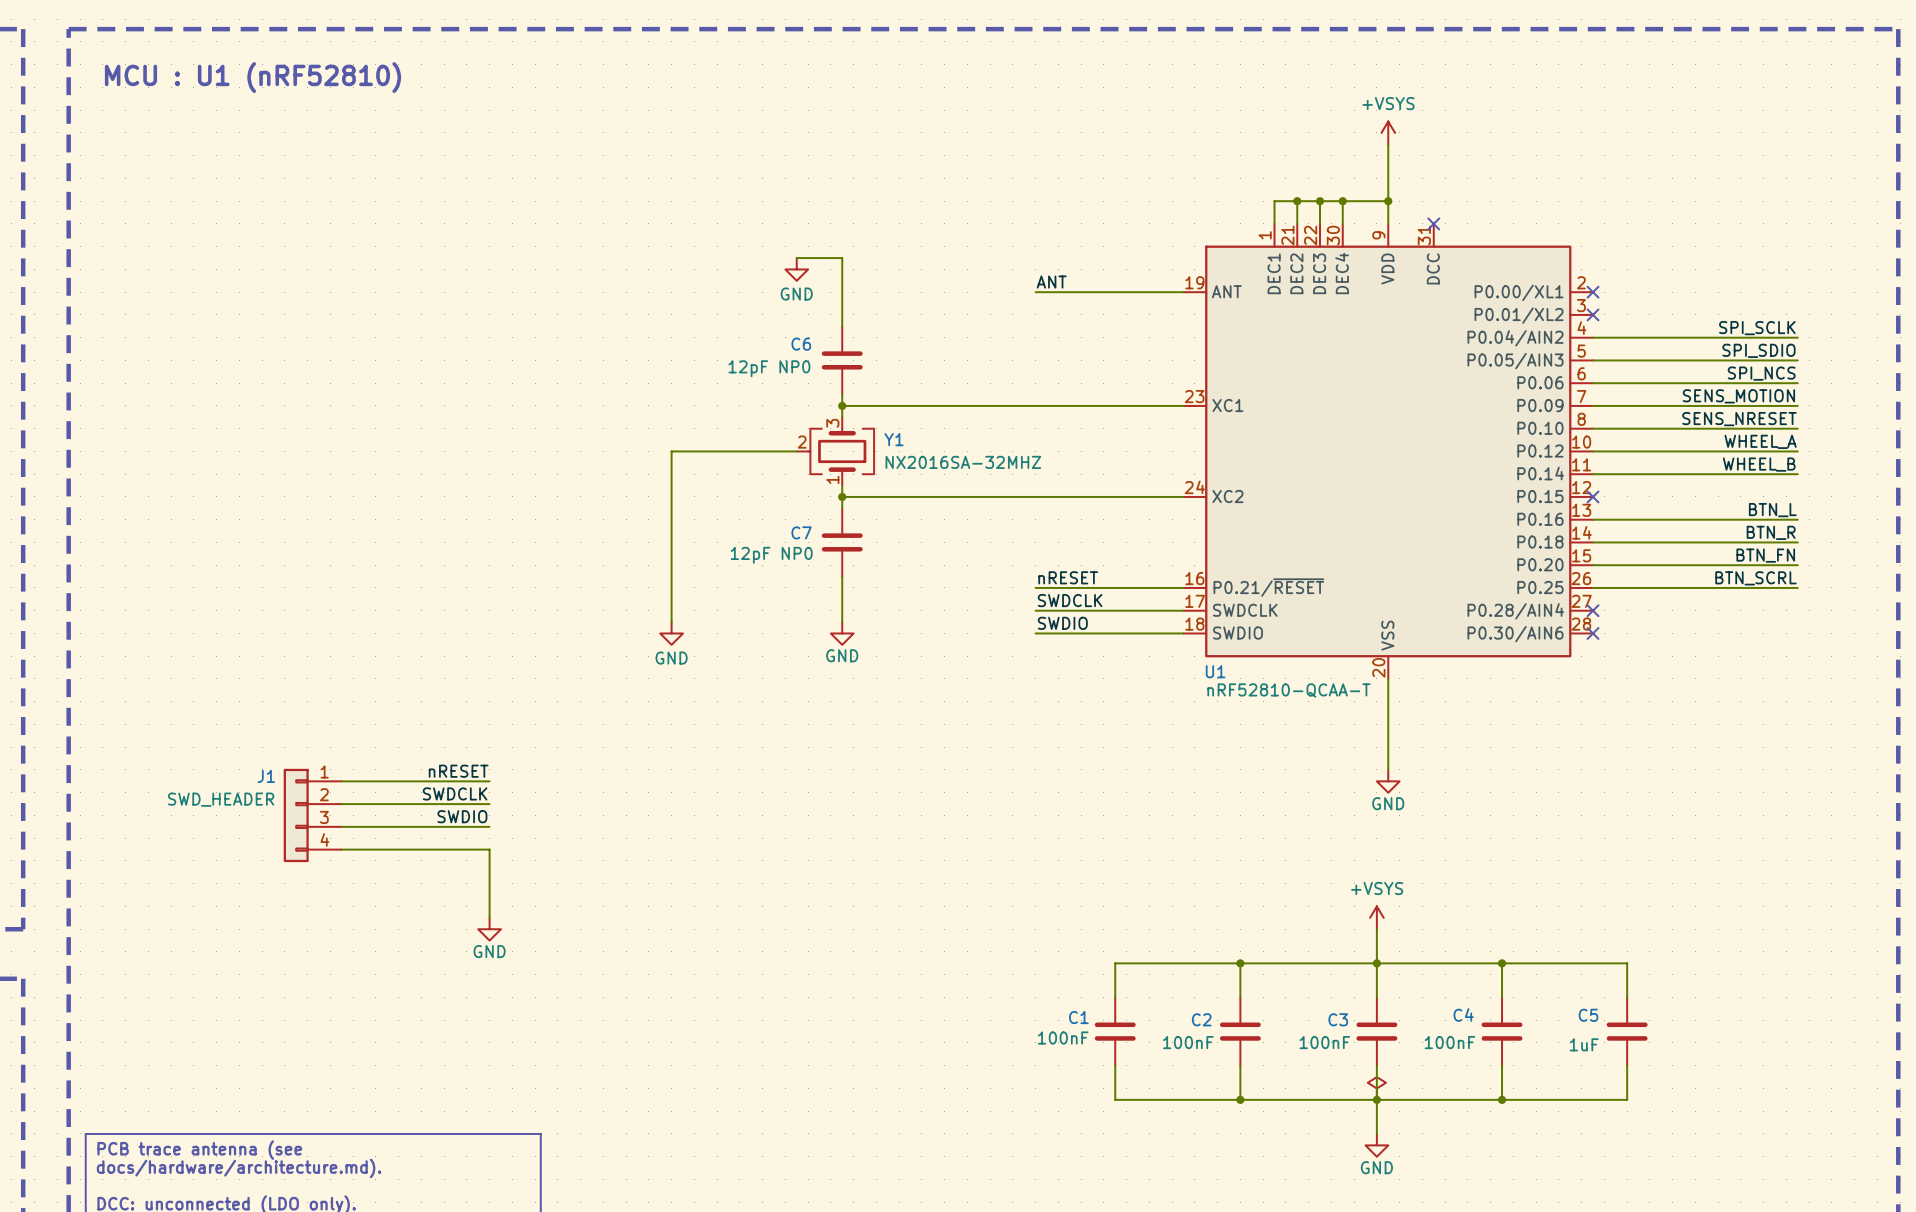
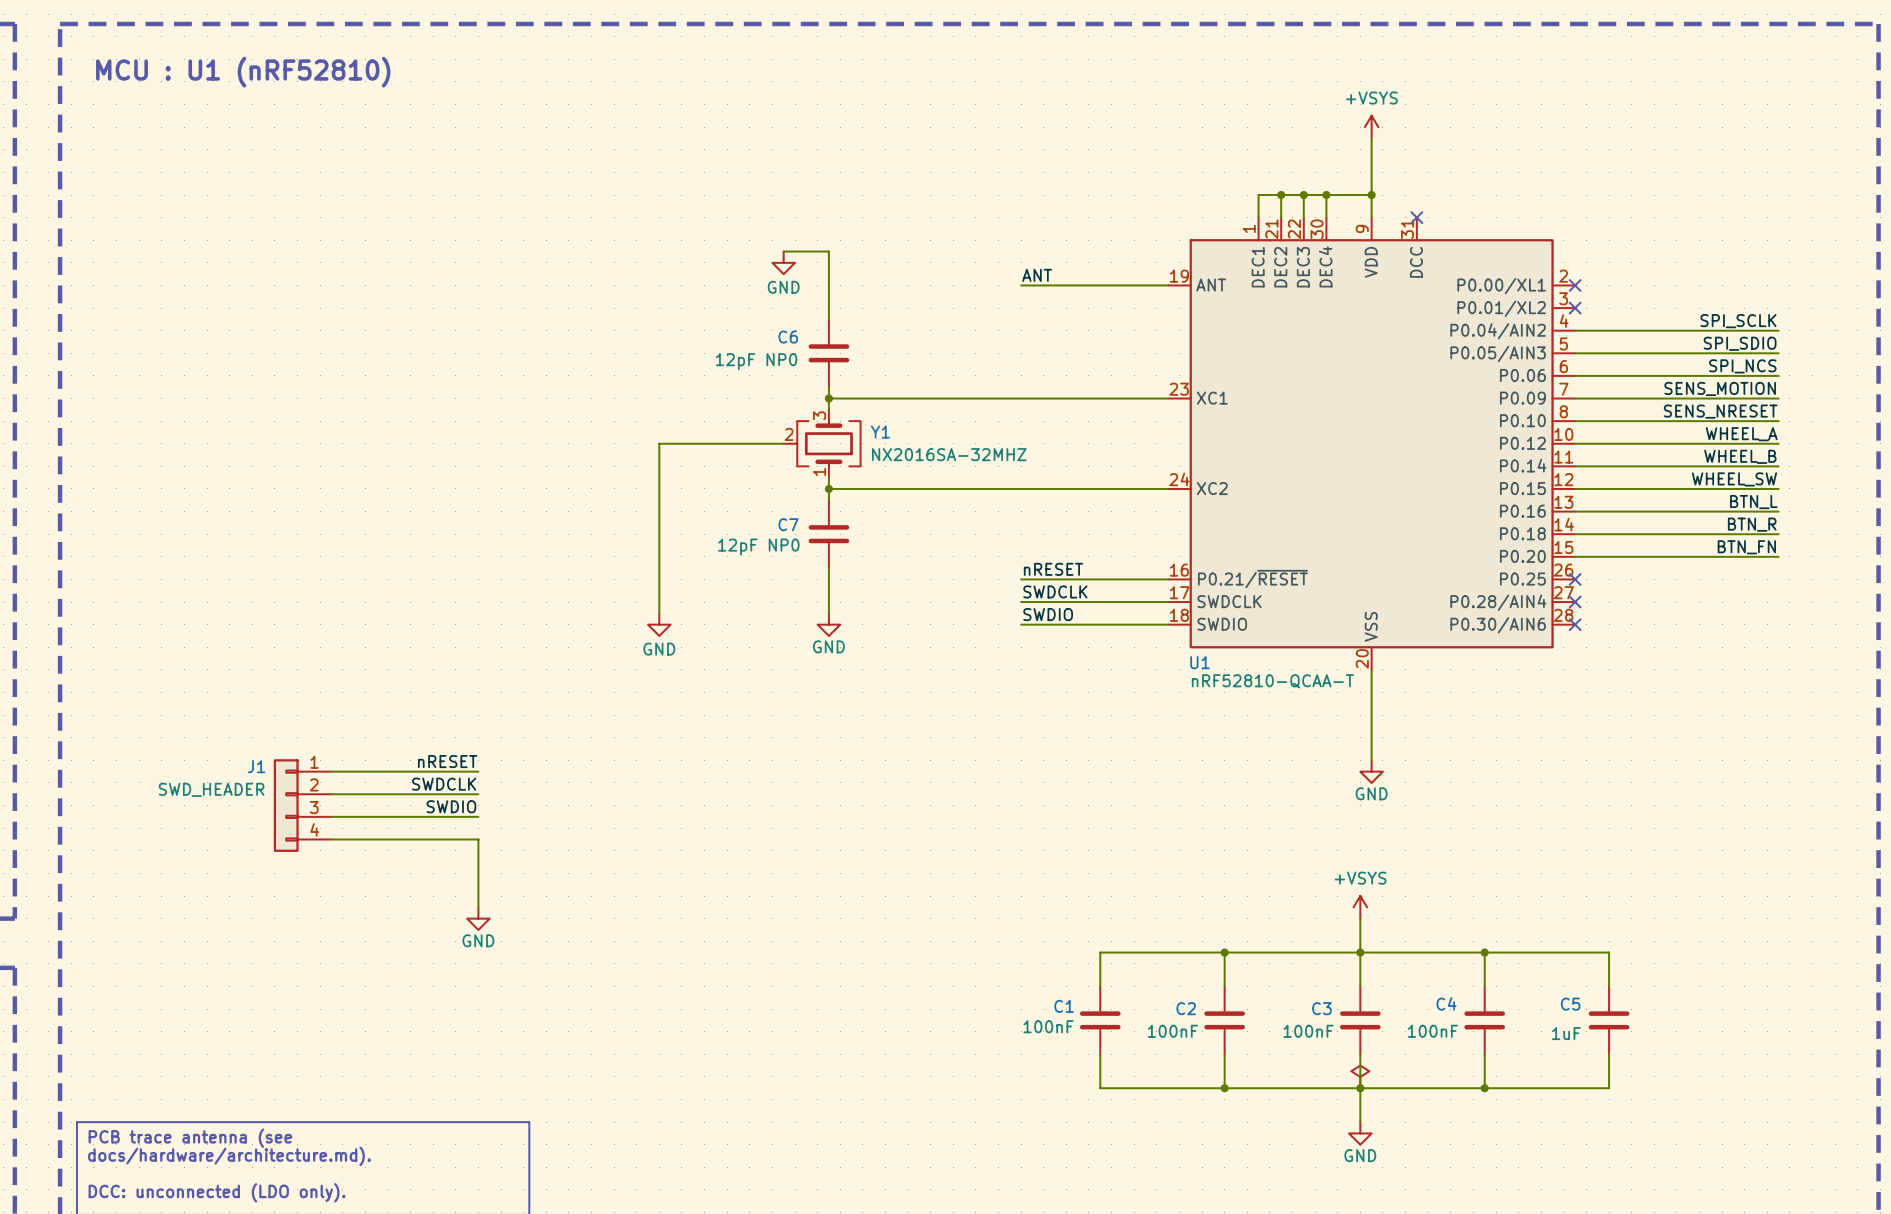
label: none -> WHEEL_SW (1734, 479)
no-connect mark: (1593, 496) -> none
label: BTN_SCRL (1755, 578) -> none
wire: (1593, 587) (1797, 587) -> (1575, 488) (1778, 488)
no-connect mark: none -> (1575, 579)

